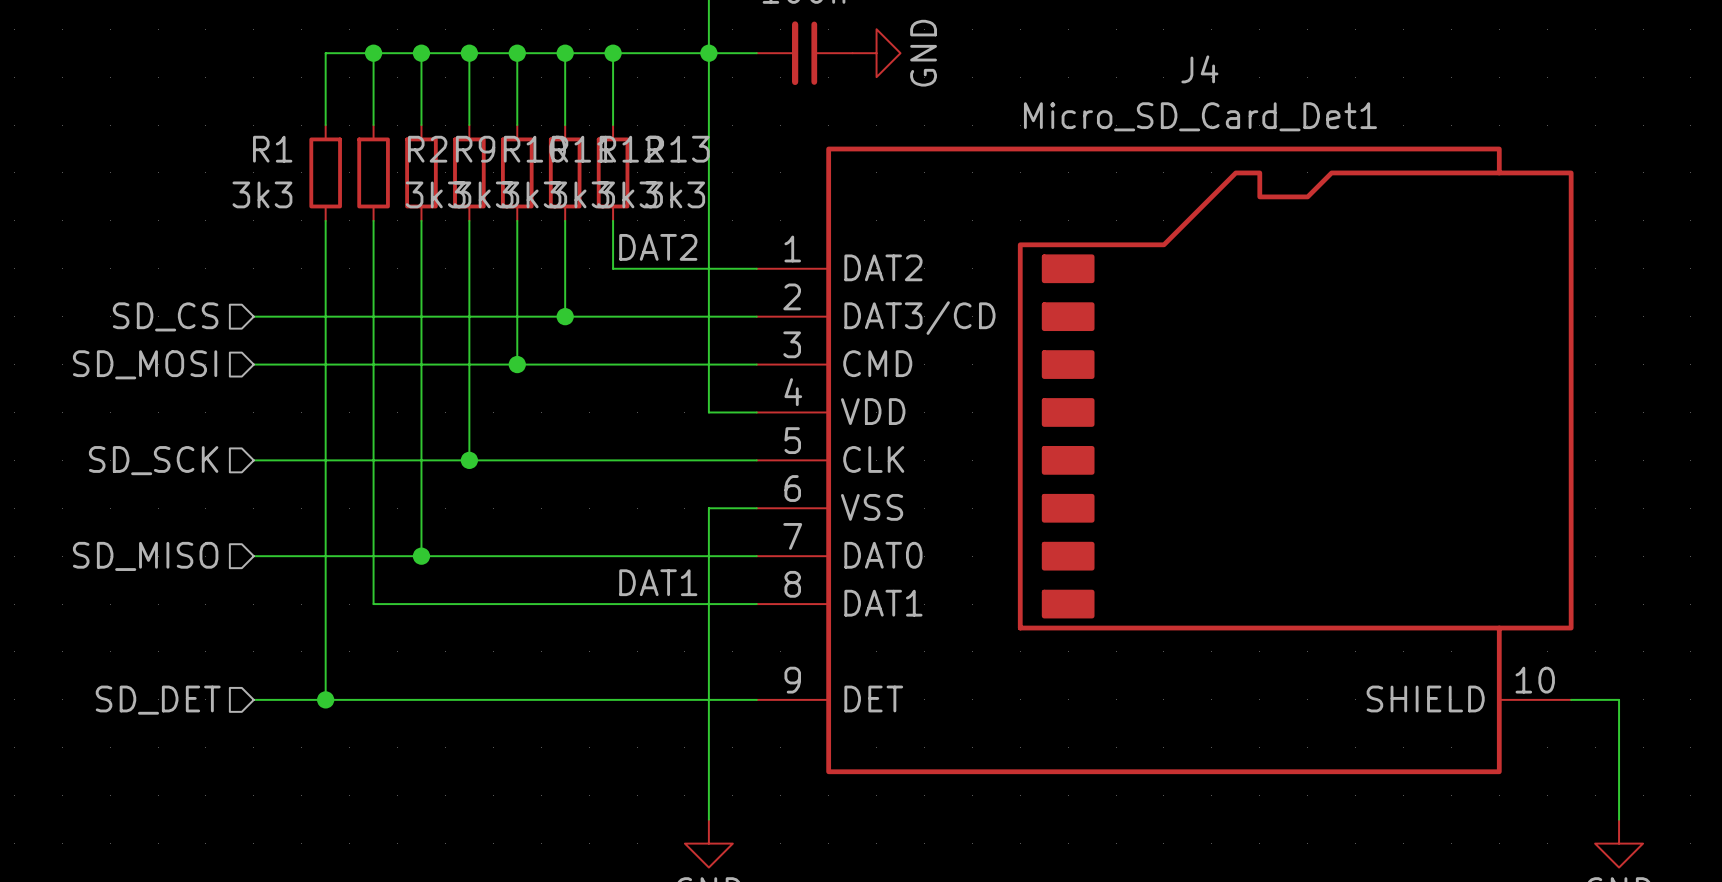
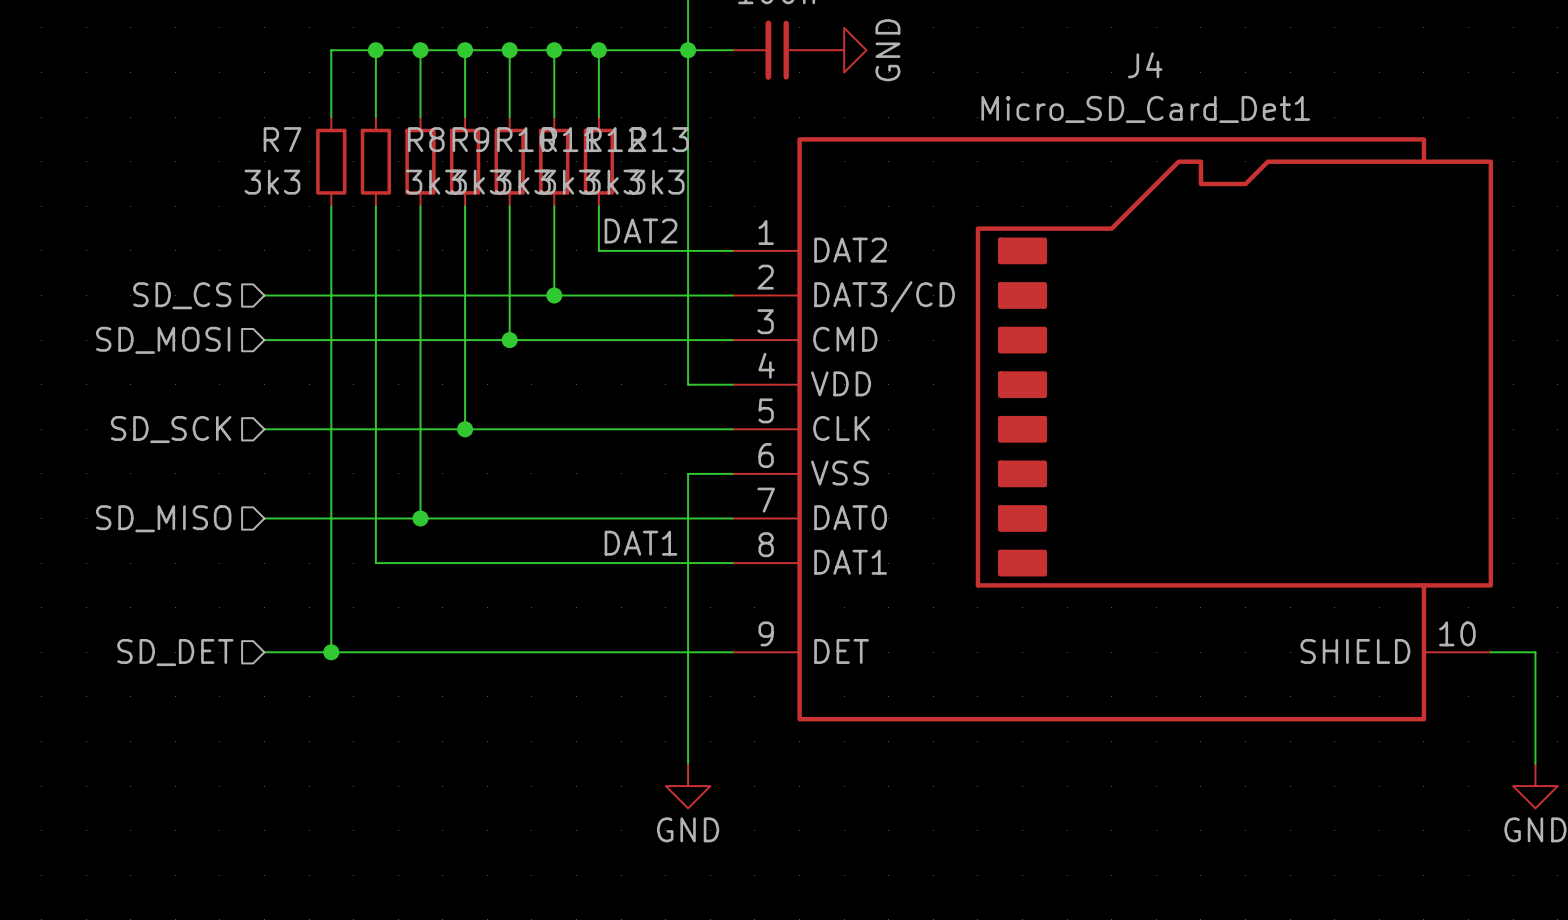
R1 name: R1 (272, 149) -> R7 (282, 139)
R2 name: R2 (427, 149) -> R8 (426, 139)

